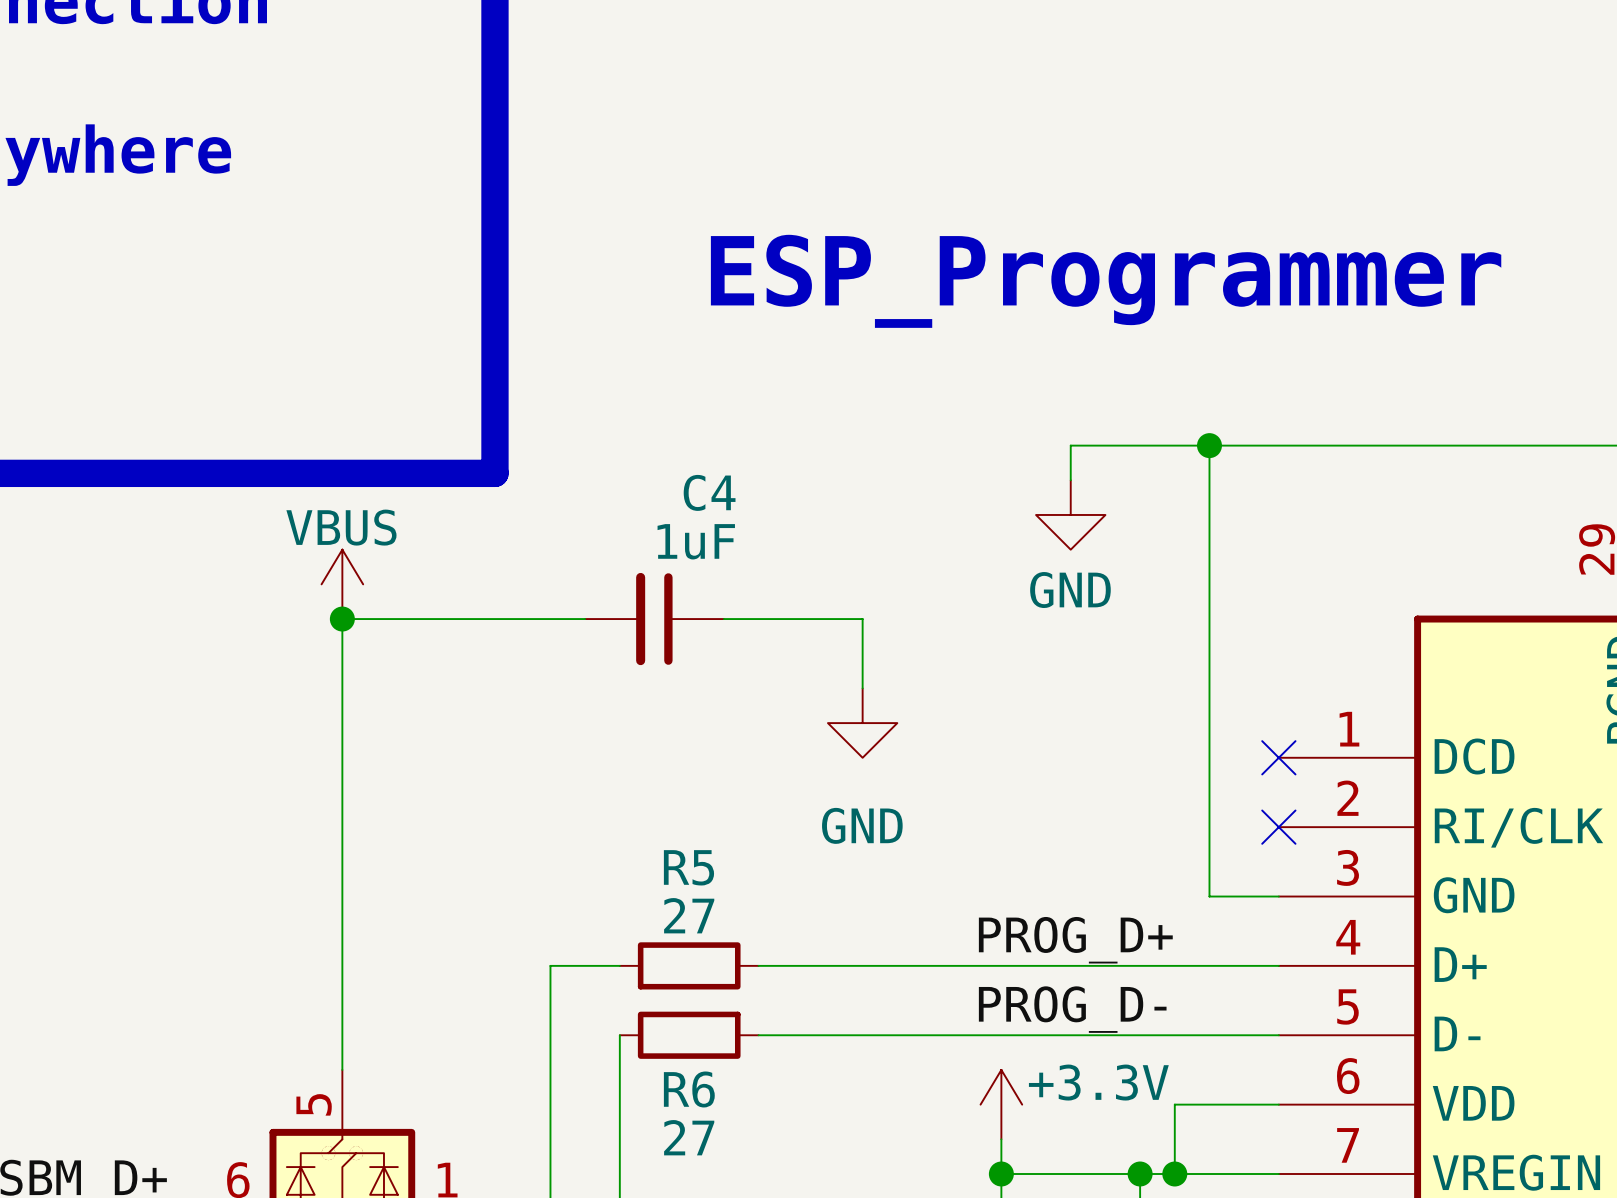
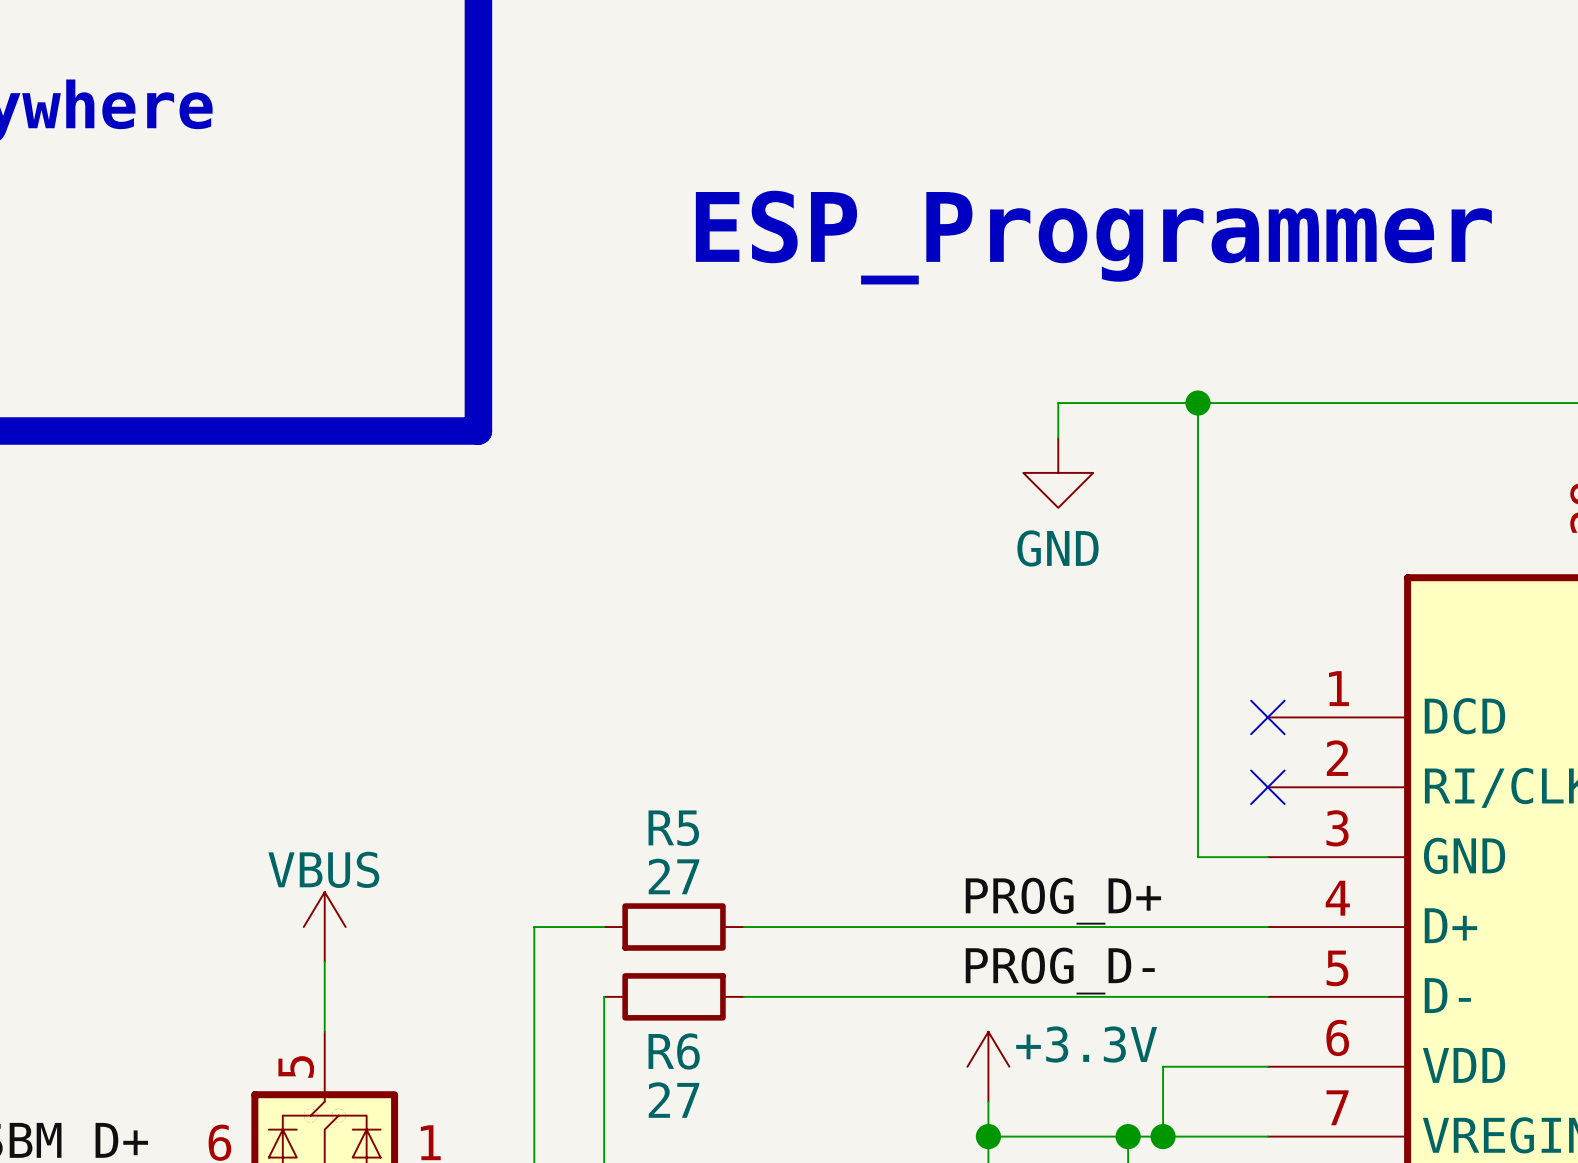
power symbol position: VBUS (342, 584) -> VBUS (324, 927)
junction: (342, 619) -> none
wire: (585, 619) (342, 619) (342, 1000) -> none
C4: 1uF (654, 619) -> none
wire: (723, 619) (862, 619) (862, 688) -> none
power symbol: GND (862, 723) -> none

